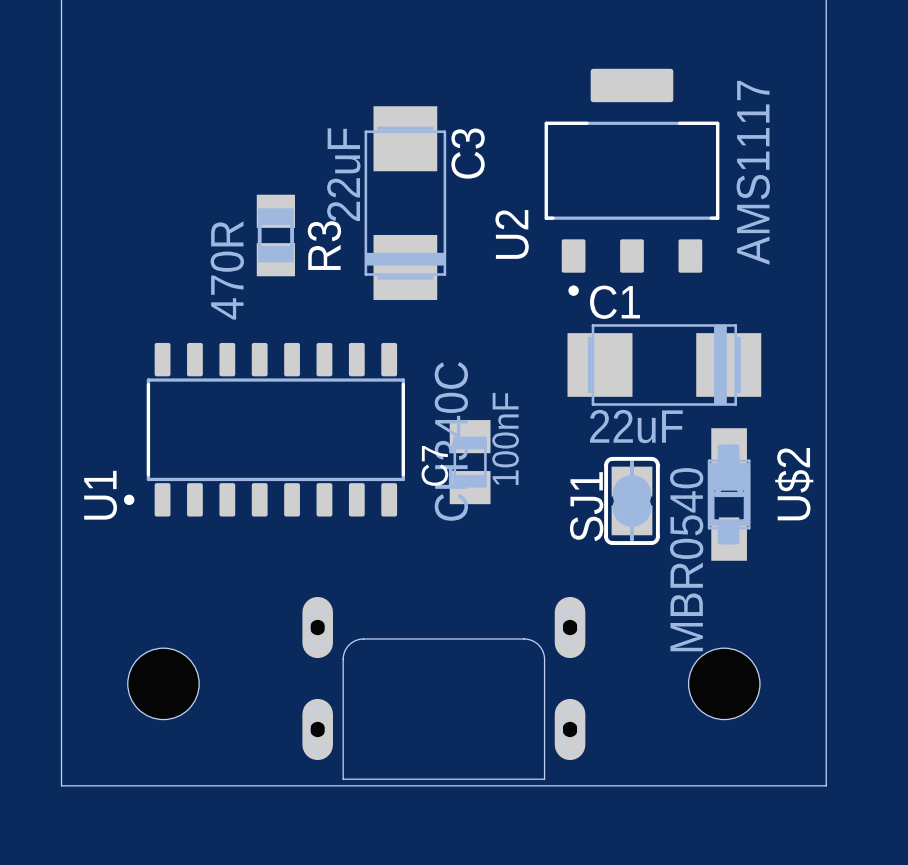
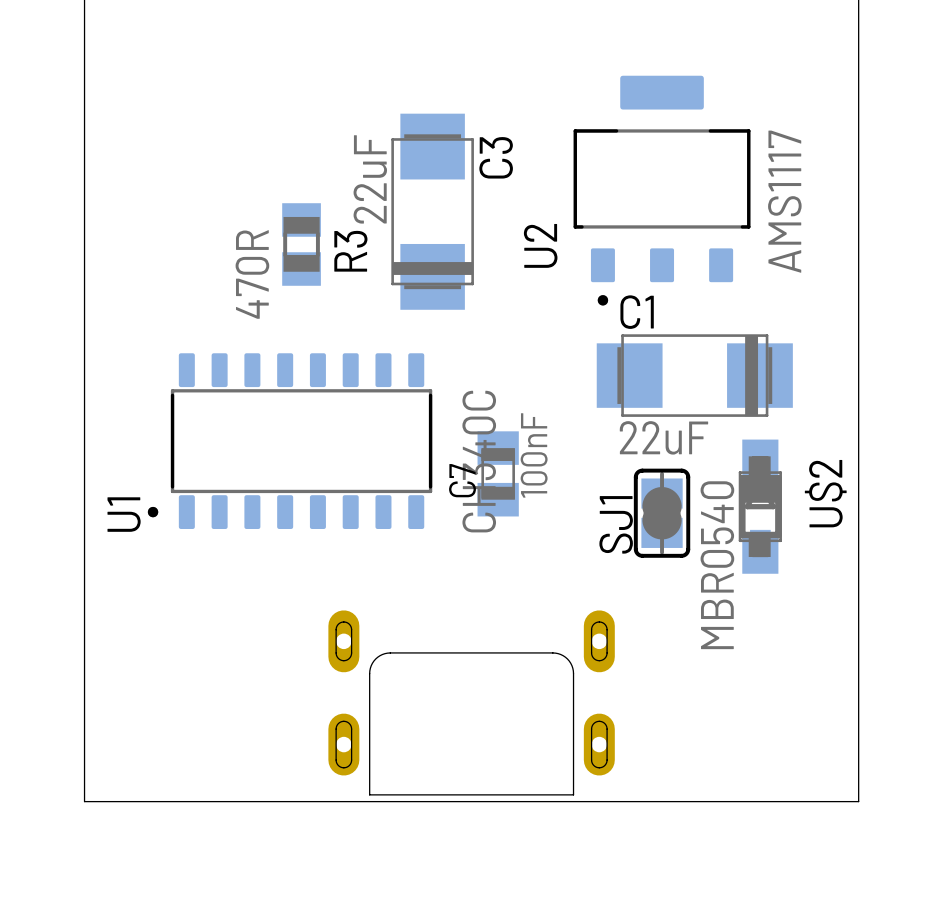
part: (163, 683) -> none
part: (724, 683) -> none

